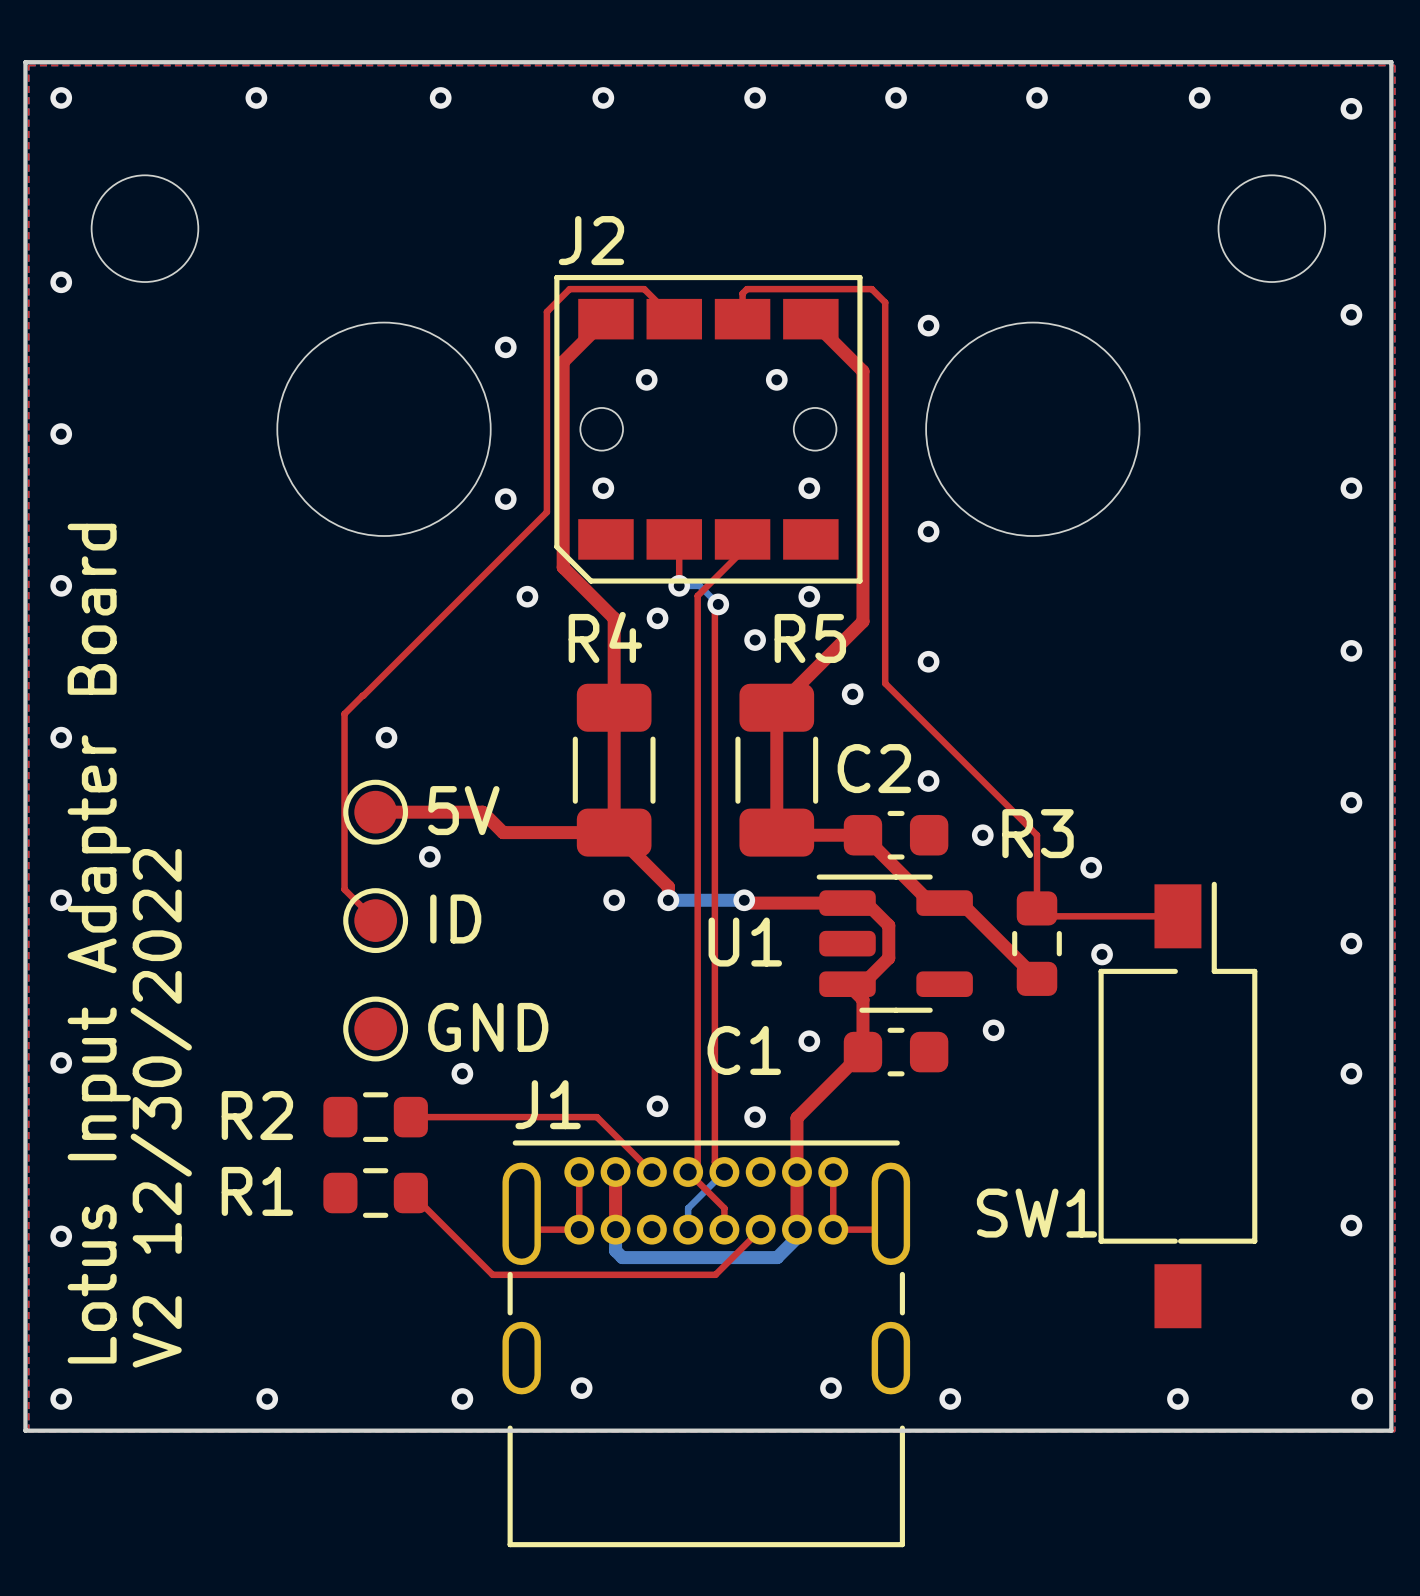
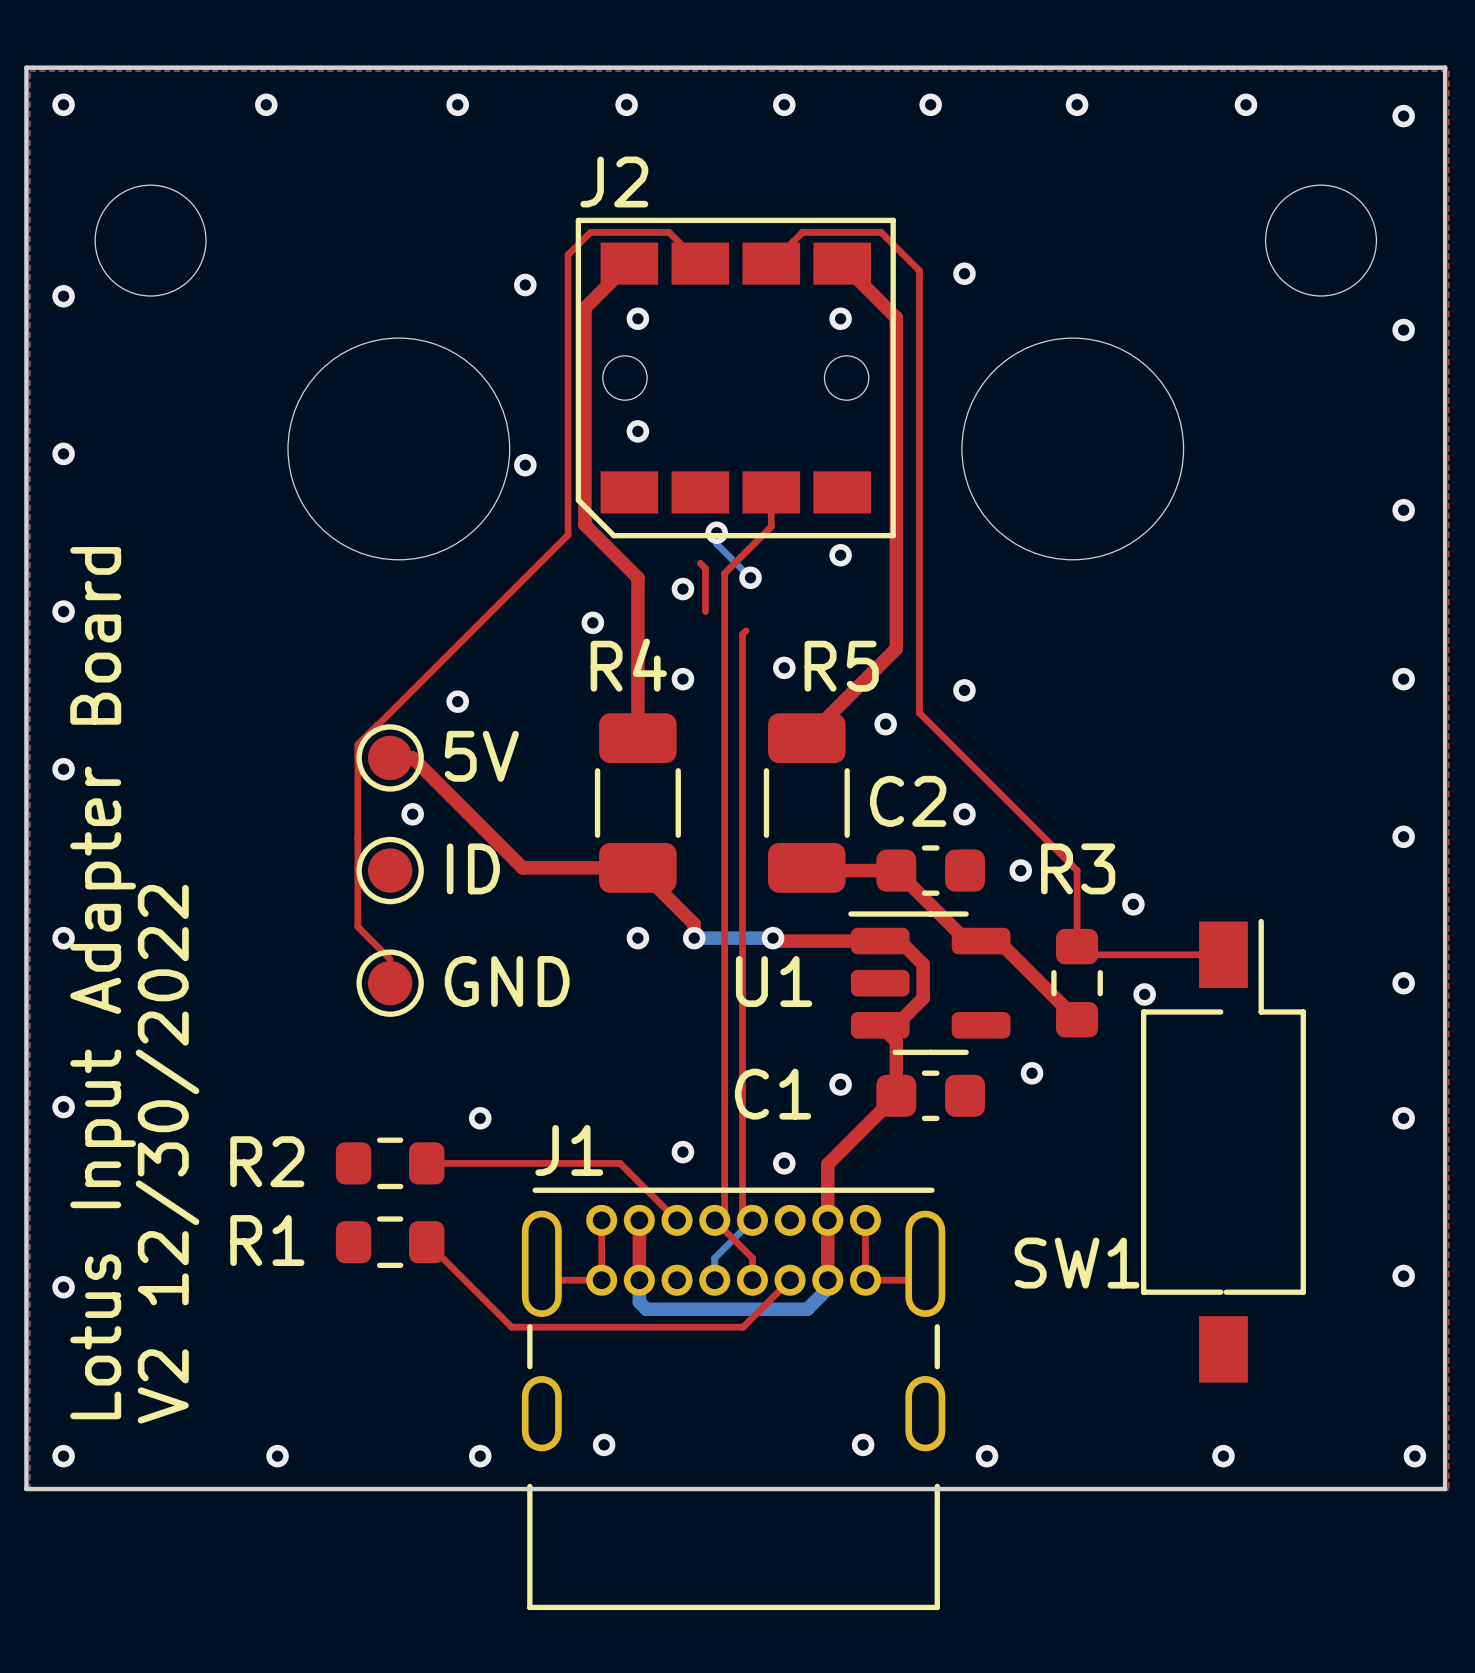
via: none -> (964, 273)
via: none -> (525, 284)
top track: (885, 302) (871, 289) (746, 289) (742, 293) (742, 319) -> (919, 317) (919, 270) (881, 232) (802, 232) (771, 263)
via: none -> (637, 318)
via: none -> (840, 318)
top track: (546, 311) (569, 289) (644, 289) (674, 319) -> (568, 326) (568, 254) (590, 232) (669, 232) (700, 263)
top track: (605, 319) (563, 361) -> (629, 263) (584, 308) (584, 379)
top track: (810, 319) (862, 371) -> (842, 263) (896, 317) (896, 388)
via: (928, 325) -> none
via: (505, 347) -> none
via: (646, 379) -> none
via: (776, 379) -> none
via: none -> (637, 431)
J2 position: (708, 429) -> (735, 378)
via: none -> (525, 465)
via: (603, 488) -> none
via: (809, 488) -> none
via: (505, 499) -> none
top track: (563, 502) (563, 567) (614, 618) -> (584, 524) (637, 577) (637, 645)
bottom track: none -> (716, 532) (716, 544) (750, 577)
via: none -> (716, 532)
via: none -> (840, 555)
via: (928, 531) -> none
top track: (742, 539) (742, 550) (697, 595) -> (771, 492) (771, 526) (724, 573) (724, 621)
via: none -> (750, 577)
via position: (679, 585) -> (682, 589)
bottom track: (687, 585) (699, 585) (718, 604) -> none
via position: (527, 596) -> (592, 622)
via: (809, 596) -> none
via: (718, 604) -> none
via: (657, 618) -> none
via: none -> (682, 679)
via: none -> (457, 701)
top track: (614, 707) (614, 832) -> none
top track: (776, 707) (776, 832) -> none
via: (386, 737) -> none
via: none -> (412, 814)
text position: 5V (463, 810) -> 5V (481, 756)
top track: (375, 812) (482, 812) -> (390, 757) (412, 757) (501, 846)
part position: (375, 812) -> (390, 870)
via: (429, 856) -> none
text position: ID (455, 919) -> ID (473, 868)
part position: (375, 920) -> (390, 983)
text position: GND (488, 1027) -> GND (507, 981)
part position: (375, 1029) -> (390, 757)

